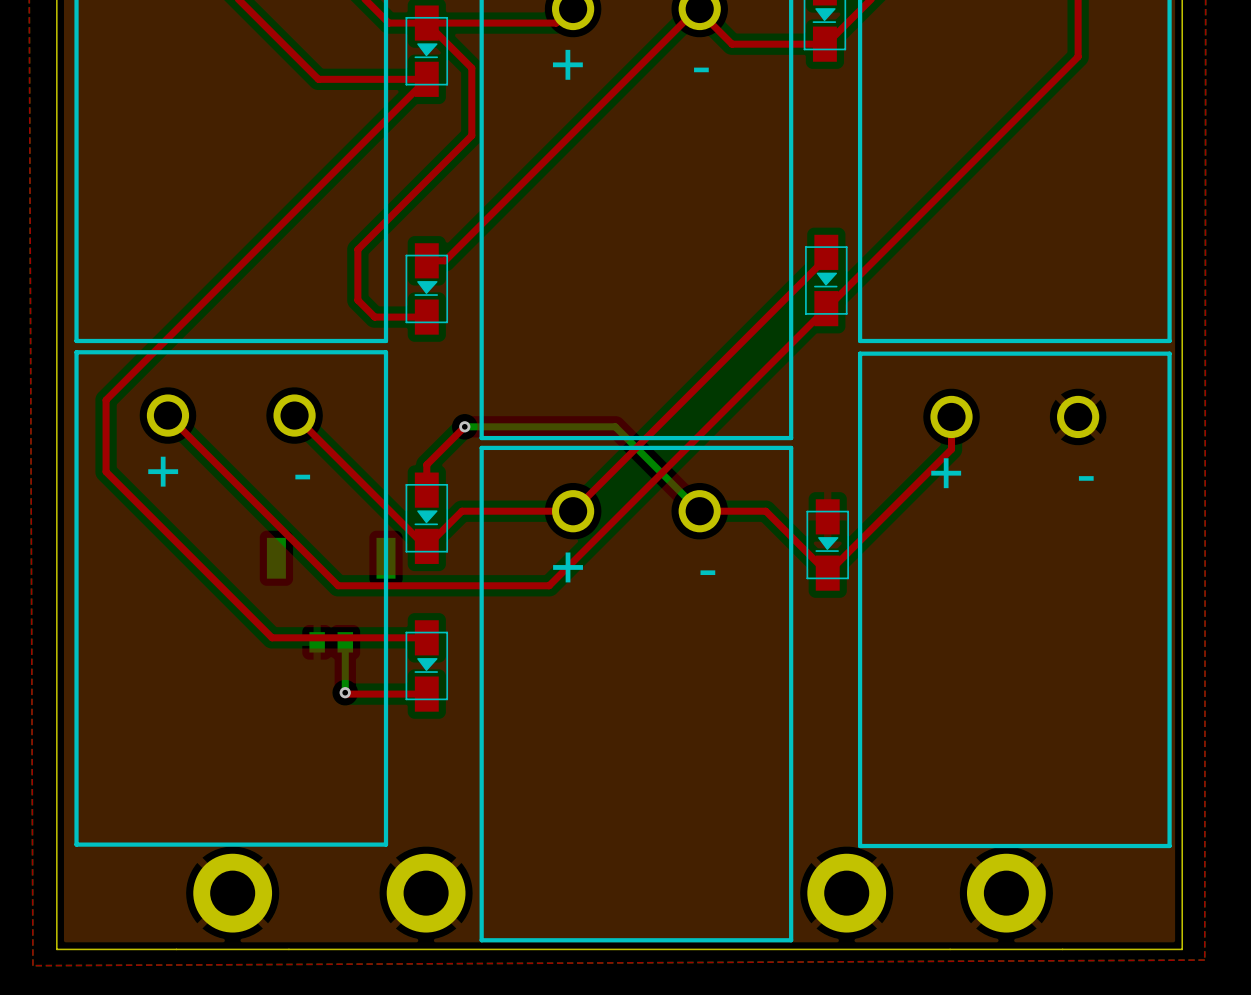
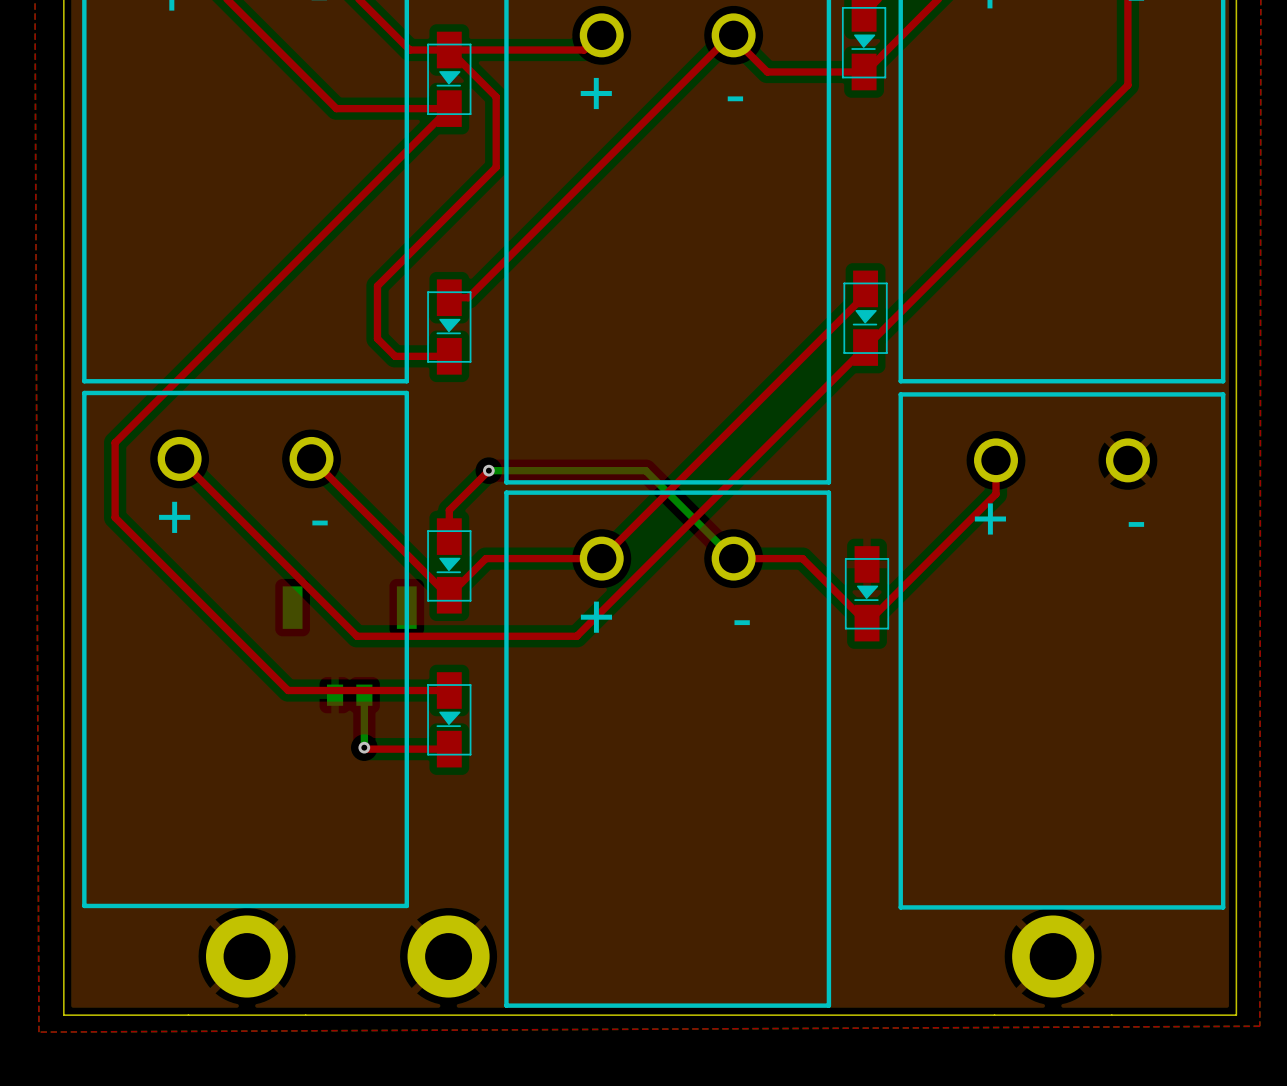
part: (846, 893) -> none

